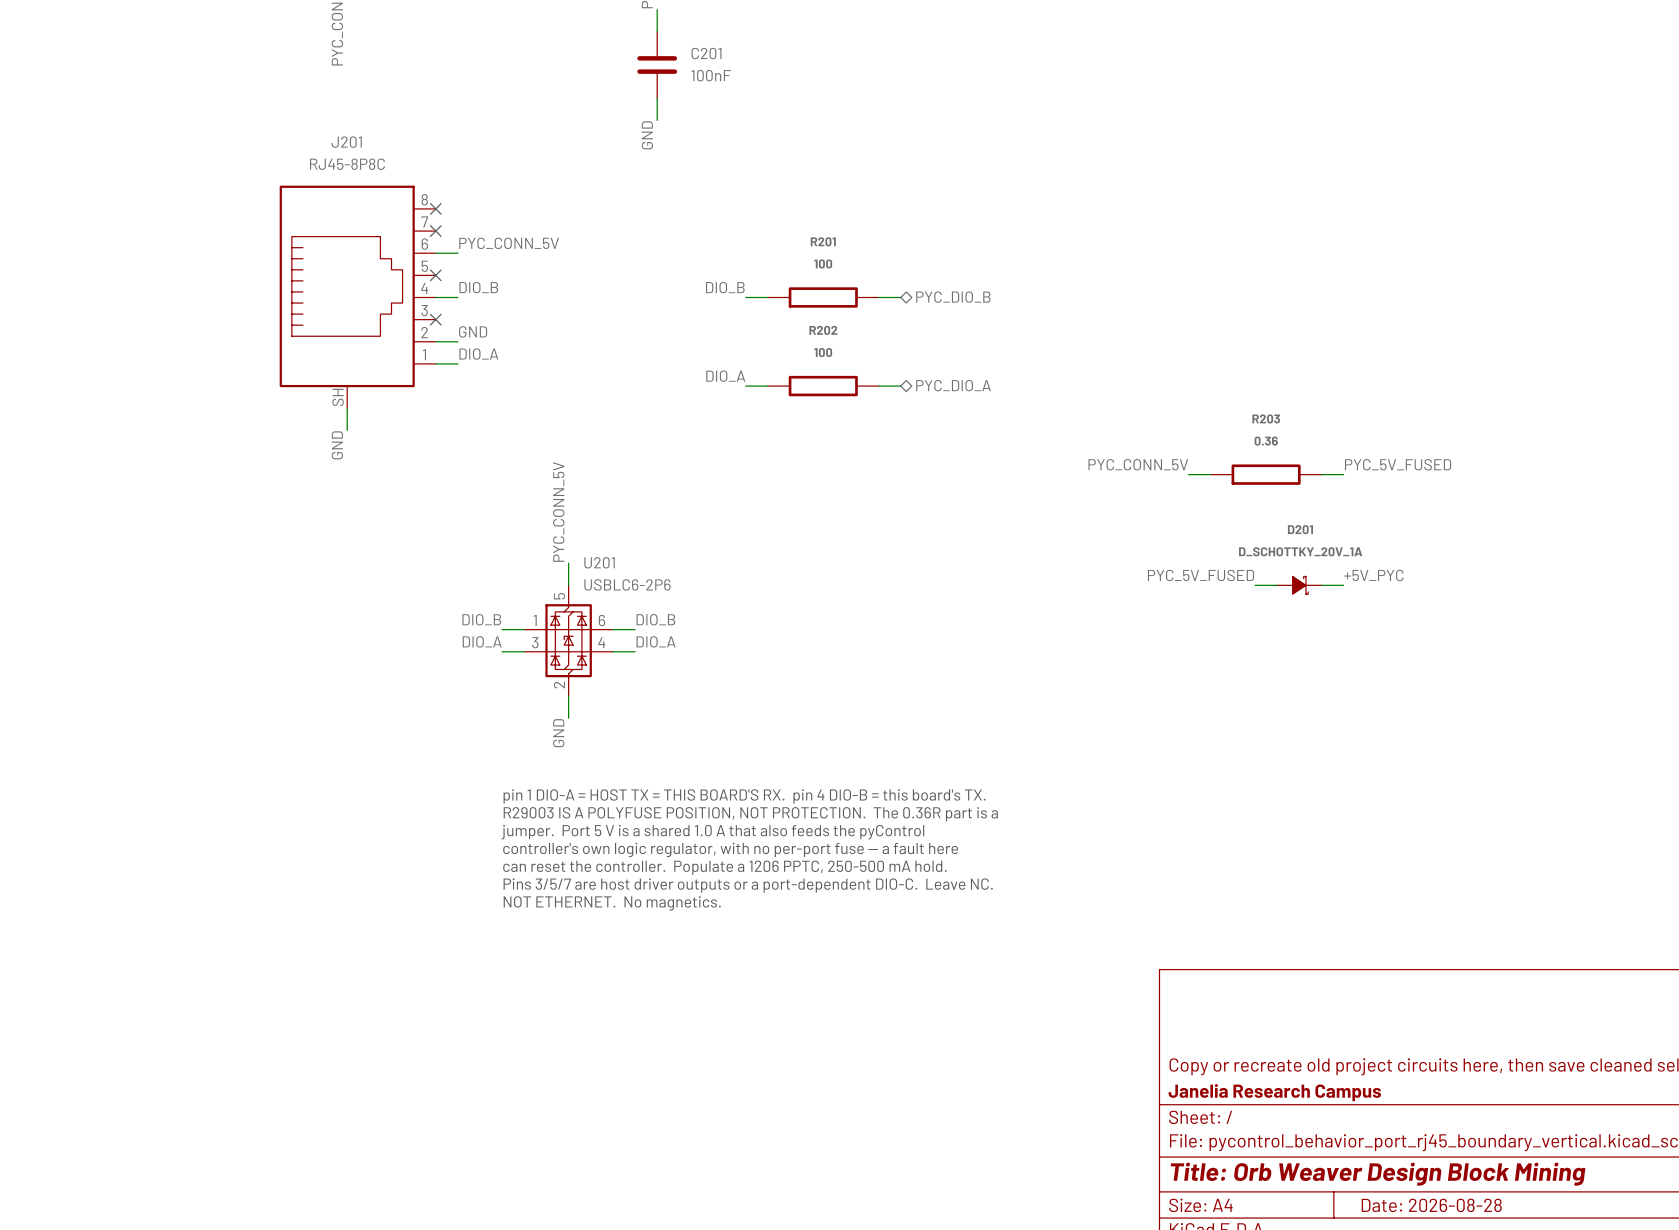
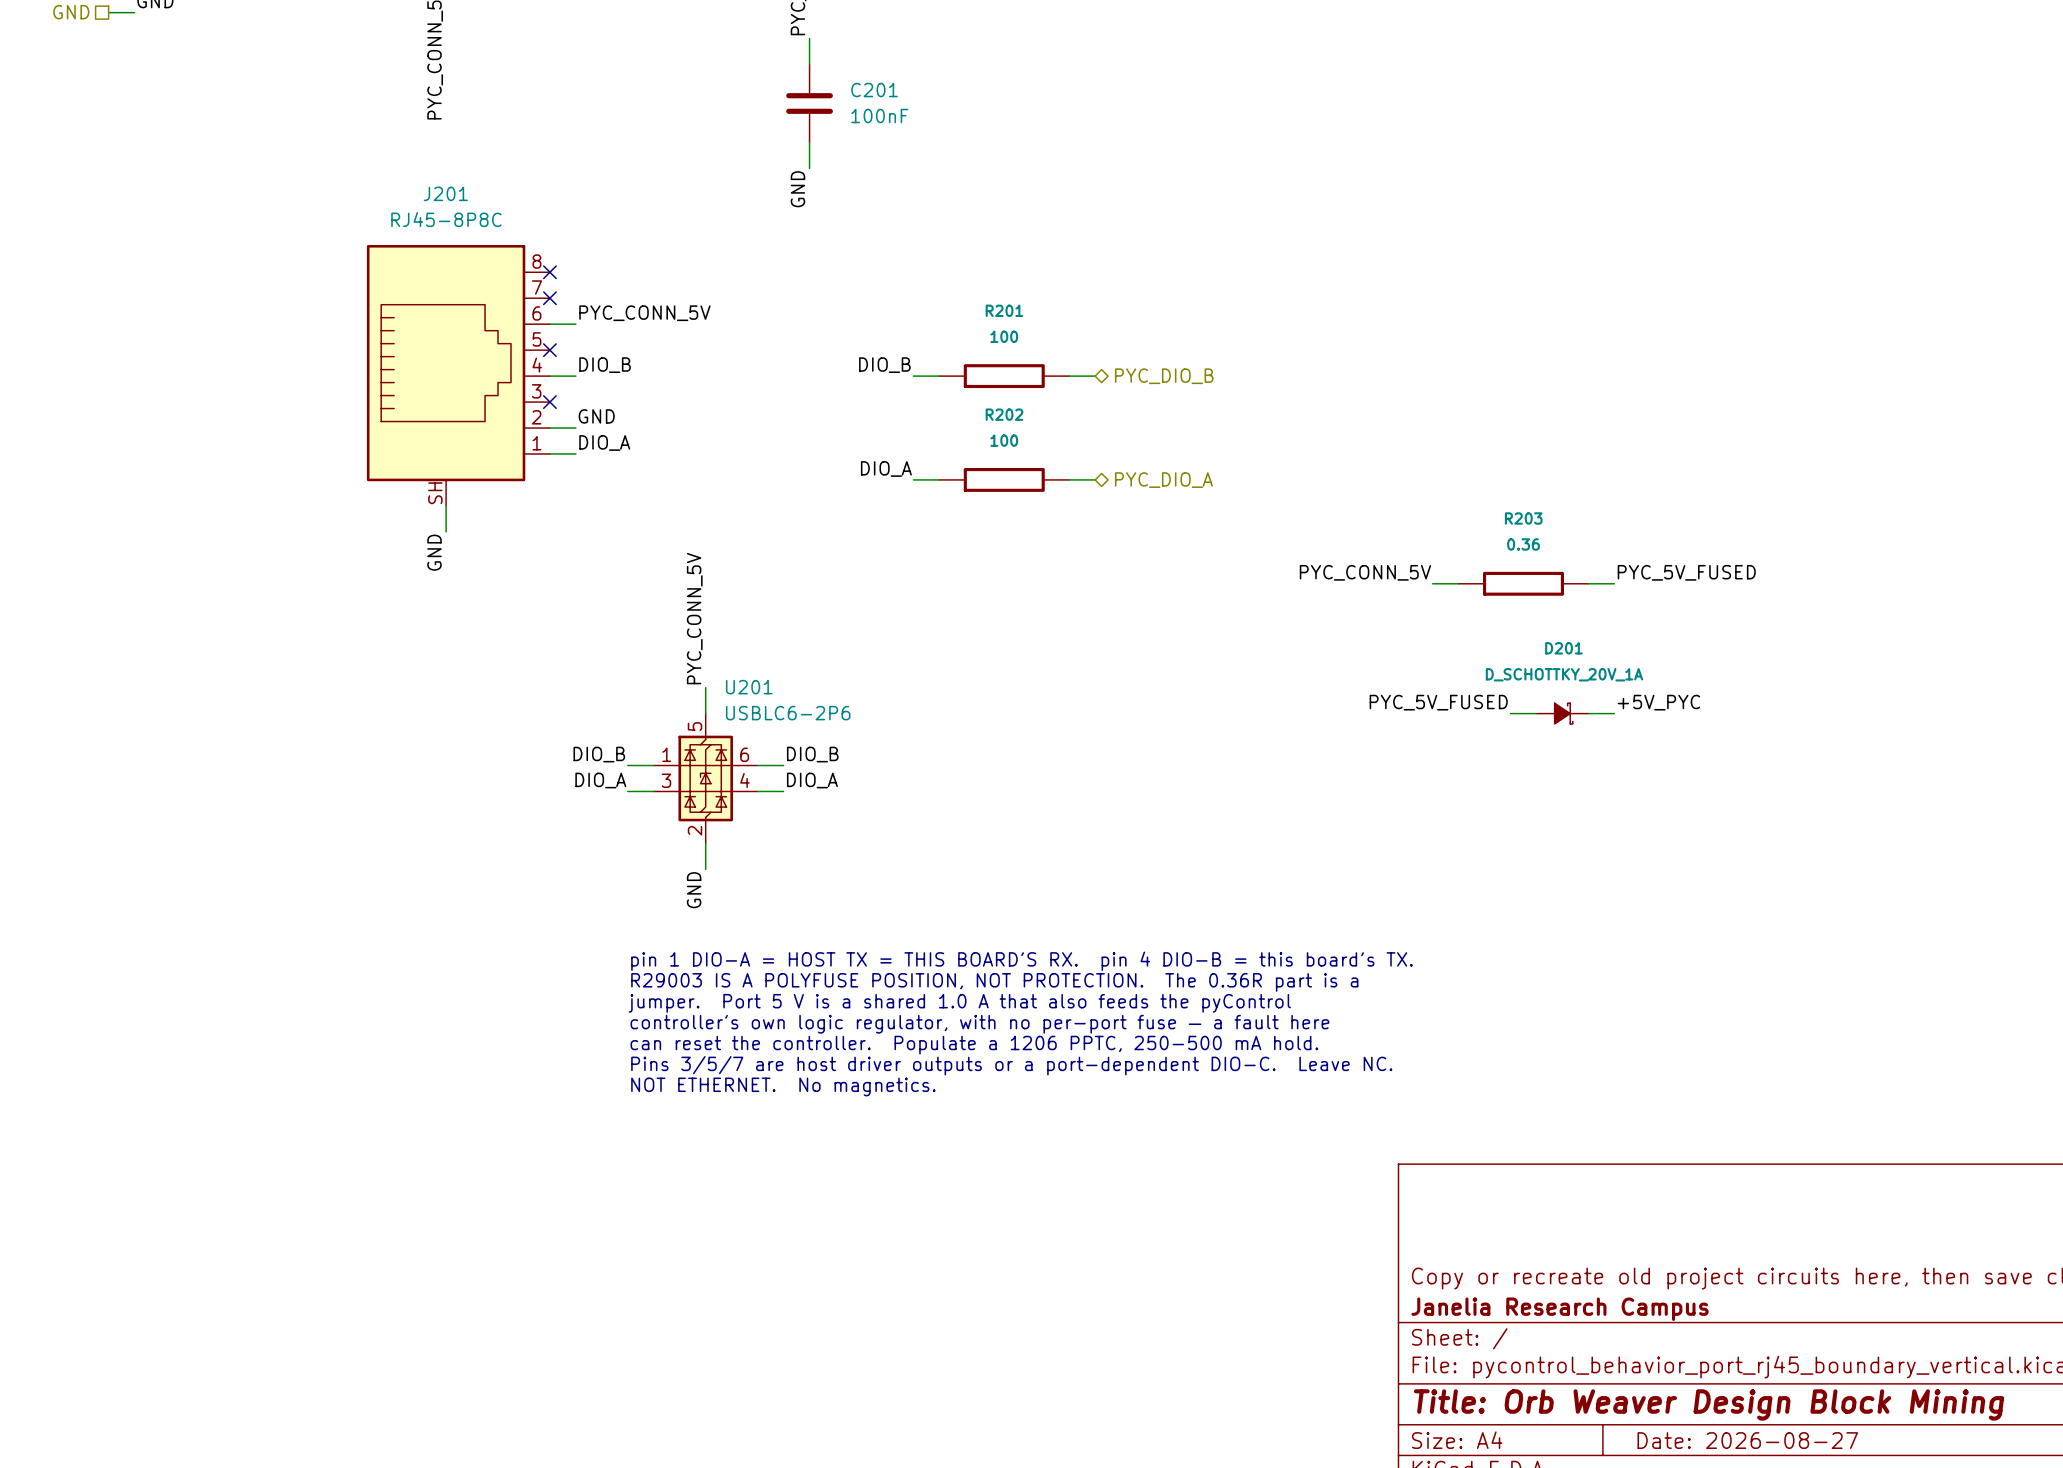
title block: Date: 2026-08-28 (1431, 1205) -> Date: 2026-08-27 (1747, 1440)

